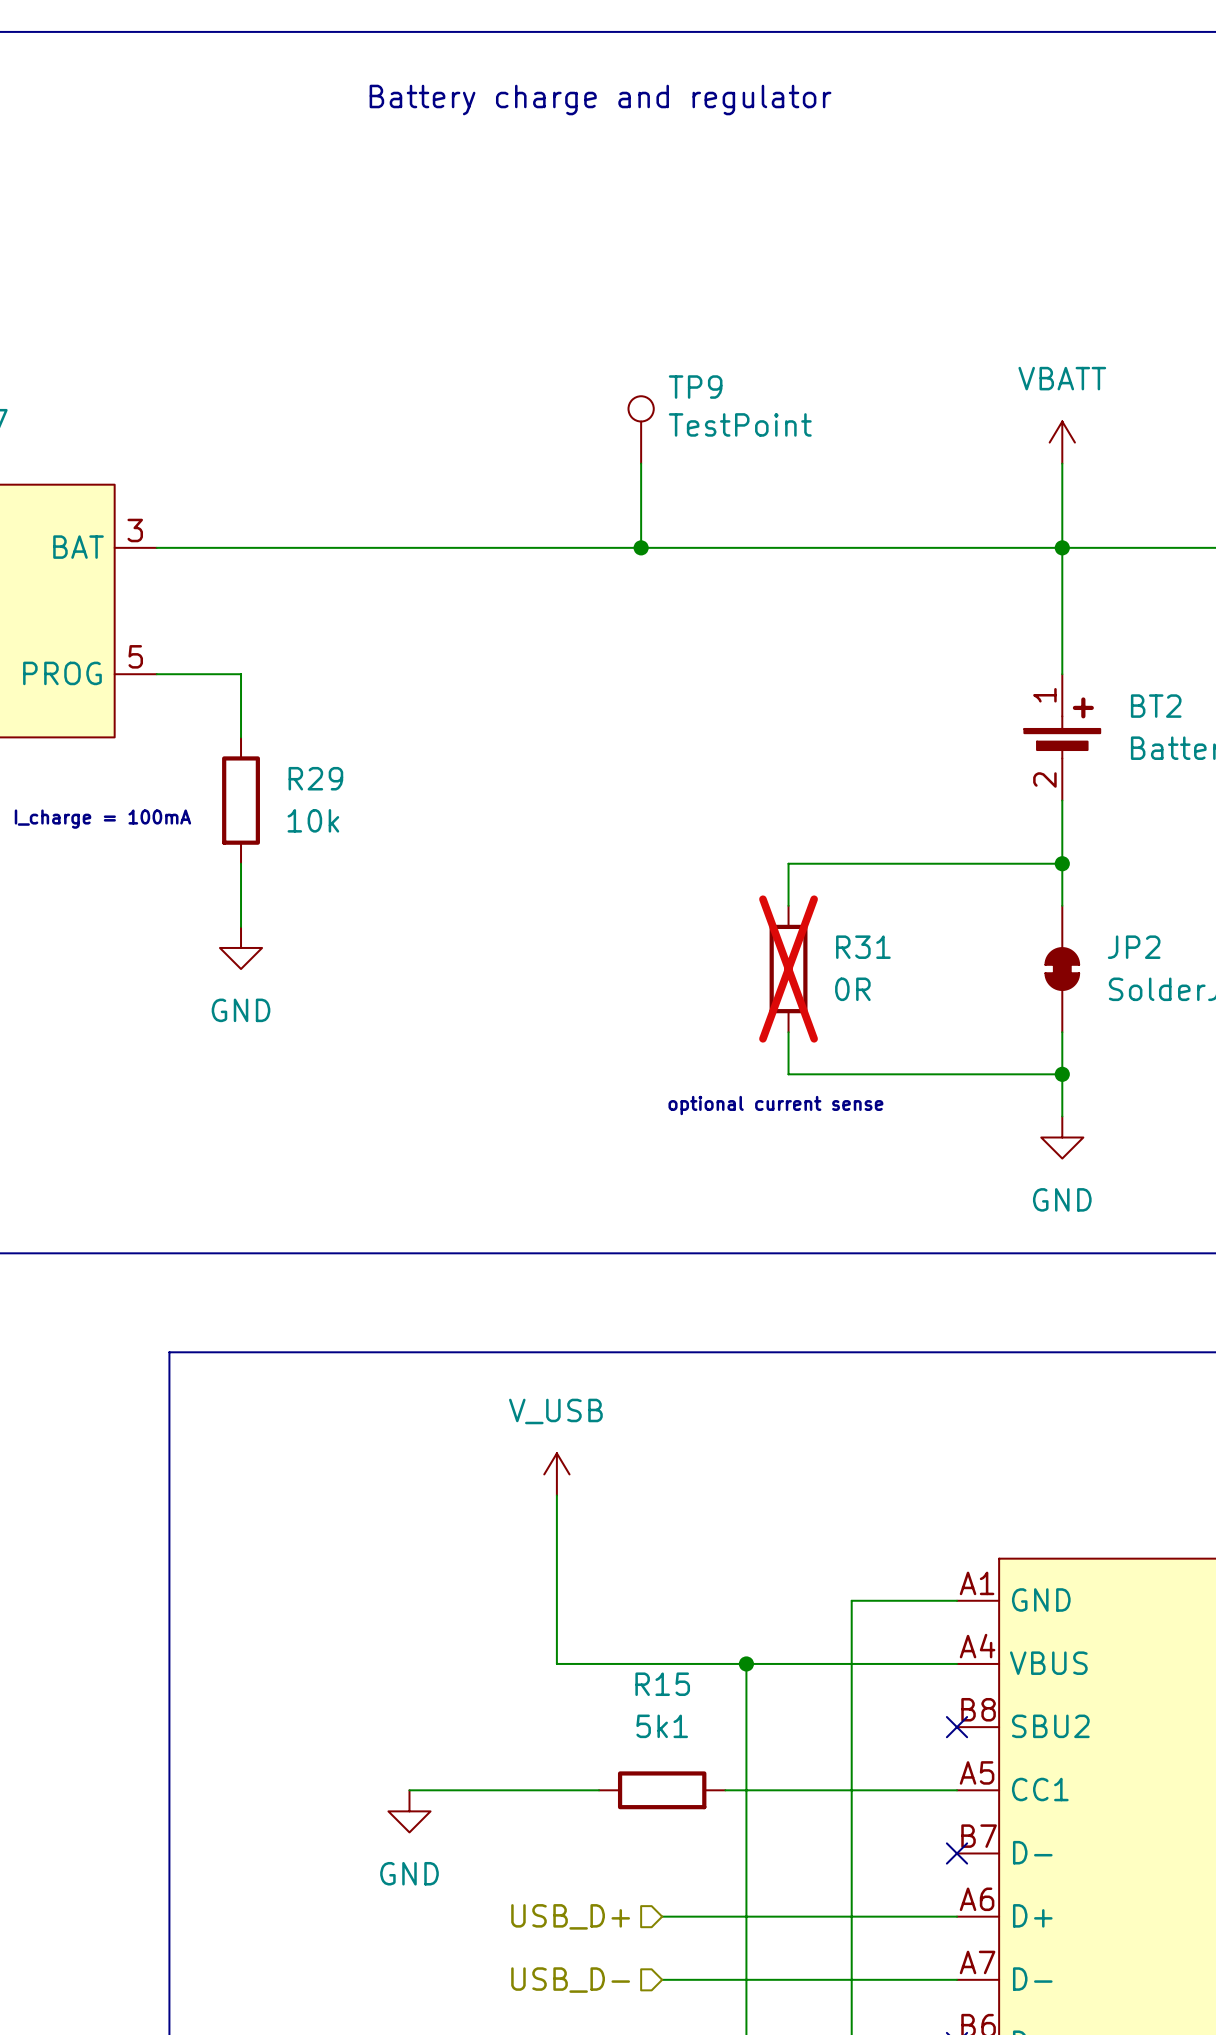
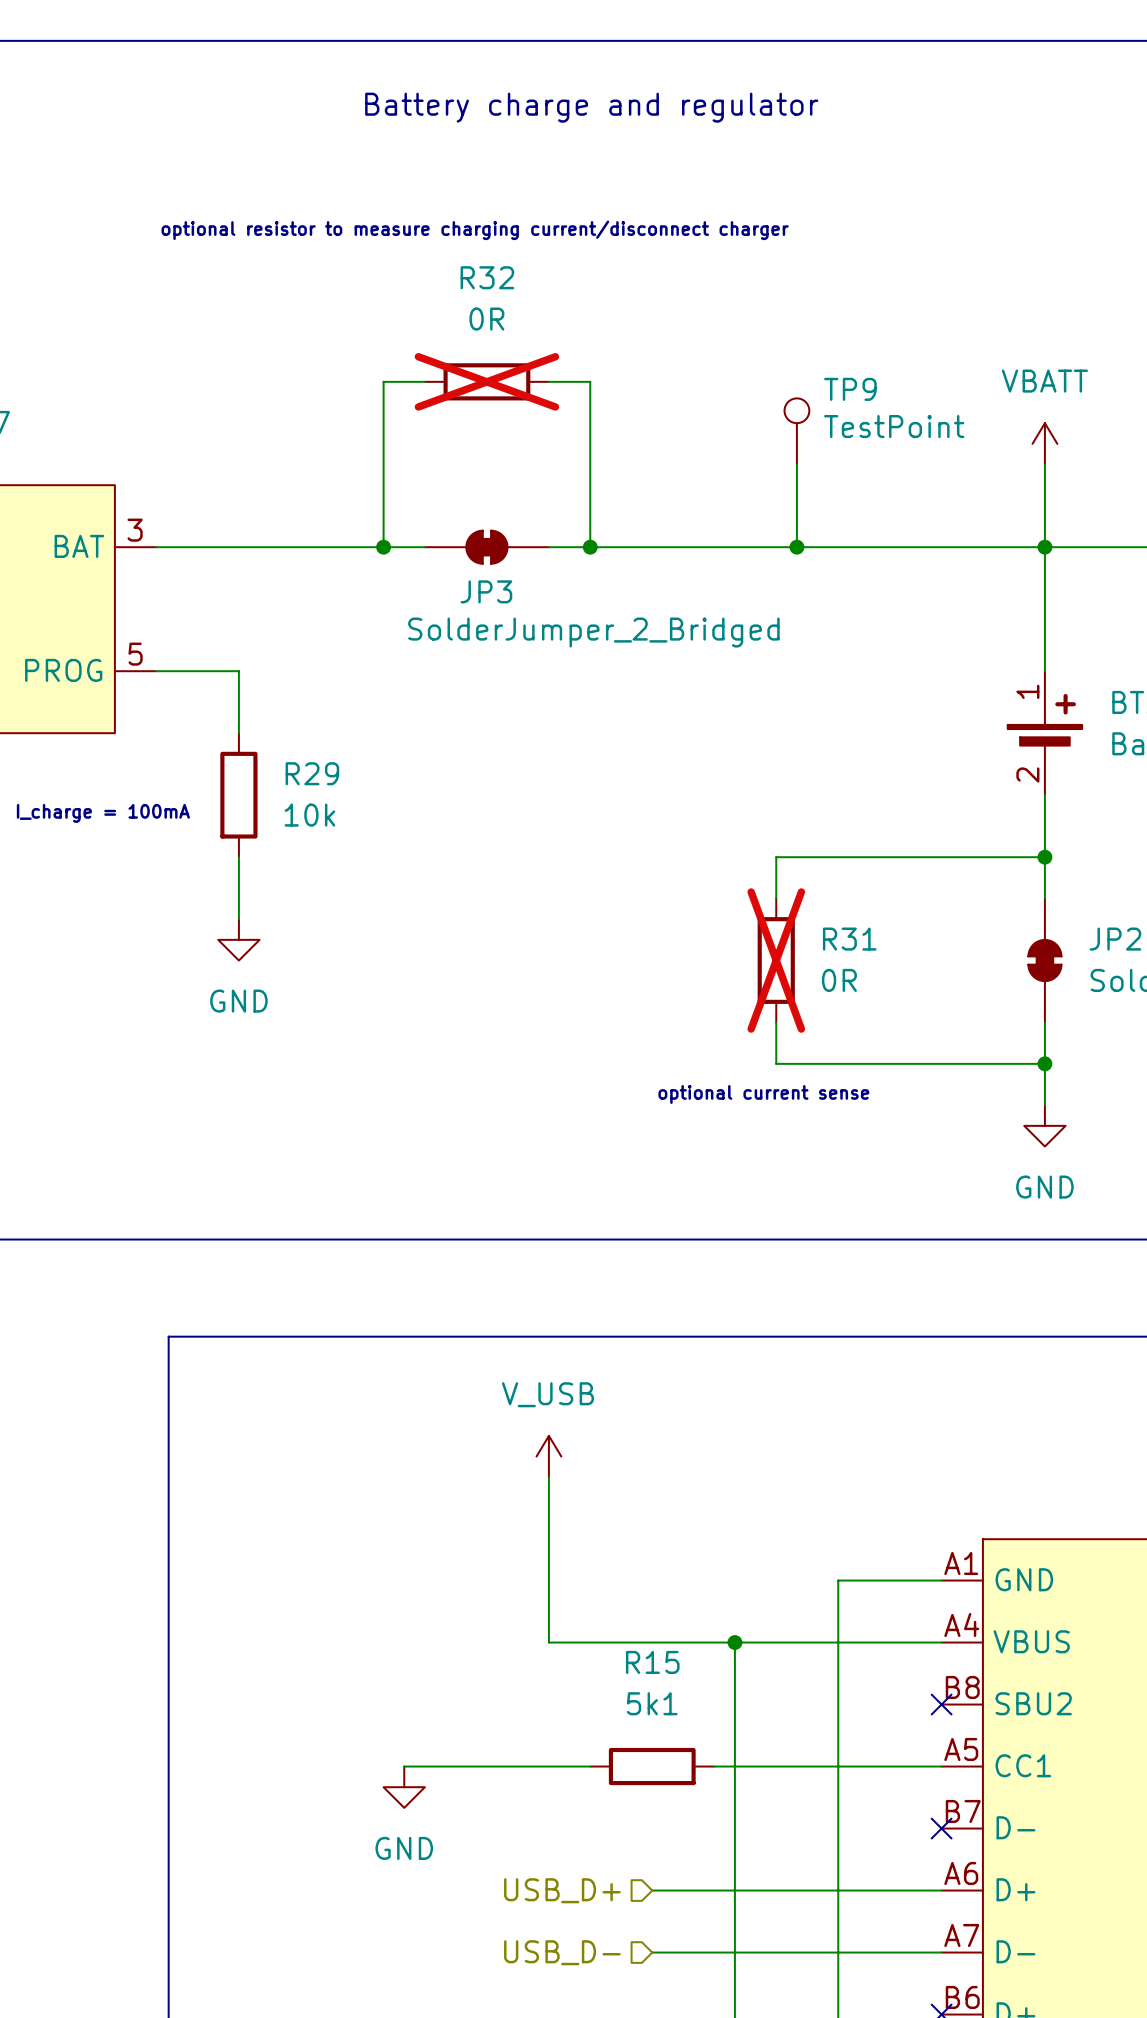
text: none -> optional resistor to measure charging current/disconnect charger (475, 230)
wire: none -> (424, 381) (383, 381) (383, 547)
R32: none -> 0R (486, 381)
wire: none -> (548, 381) (590, 381) (590, 547)
TP9 position: (641, 429) -> (796, 431)
wire: (641, 463) (641, 547) -> (796, 464) (796, 547)
junction: none -> (383, 547)
JP3: none -> SolderJumper_2_Bridged (486, 547)
junction position: (641, 547) -> (590, 547)
junction: none -> (796, 547)

